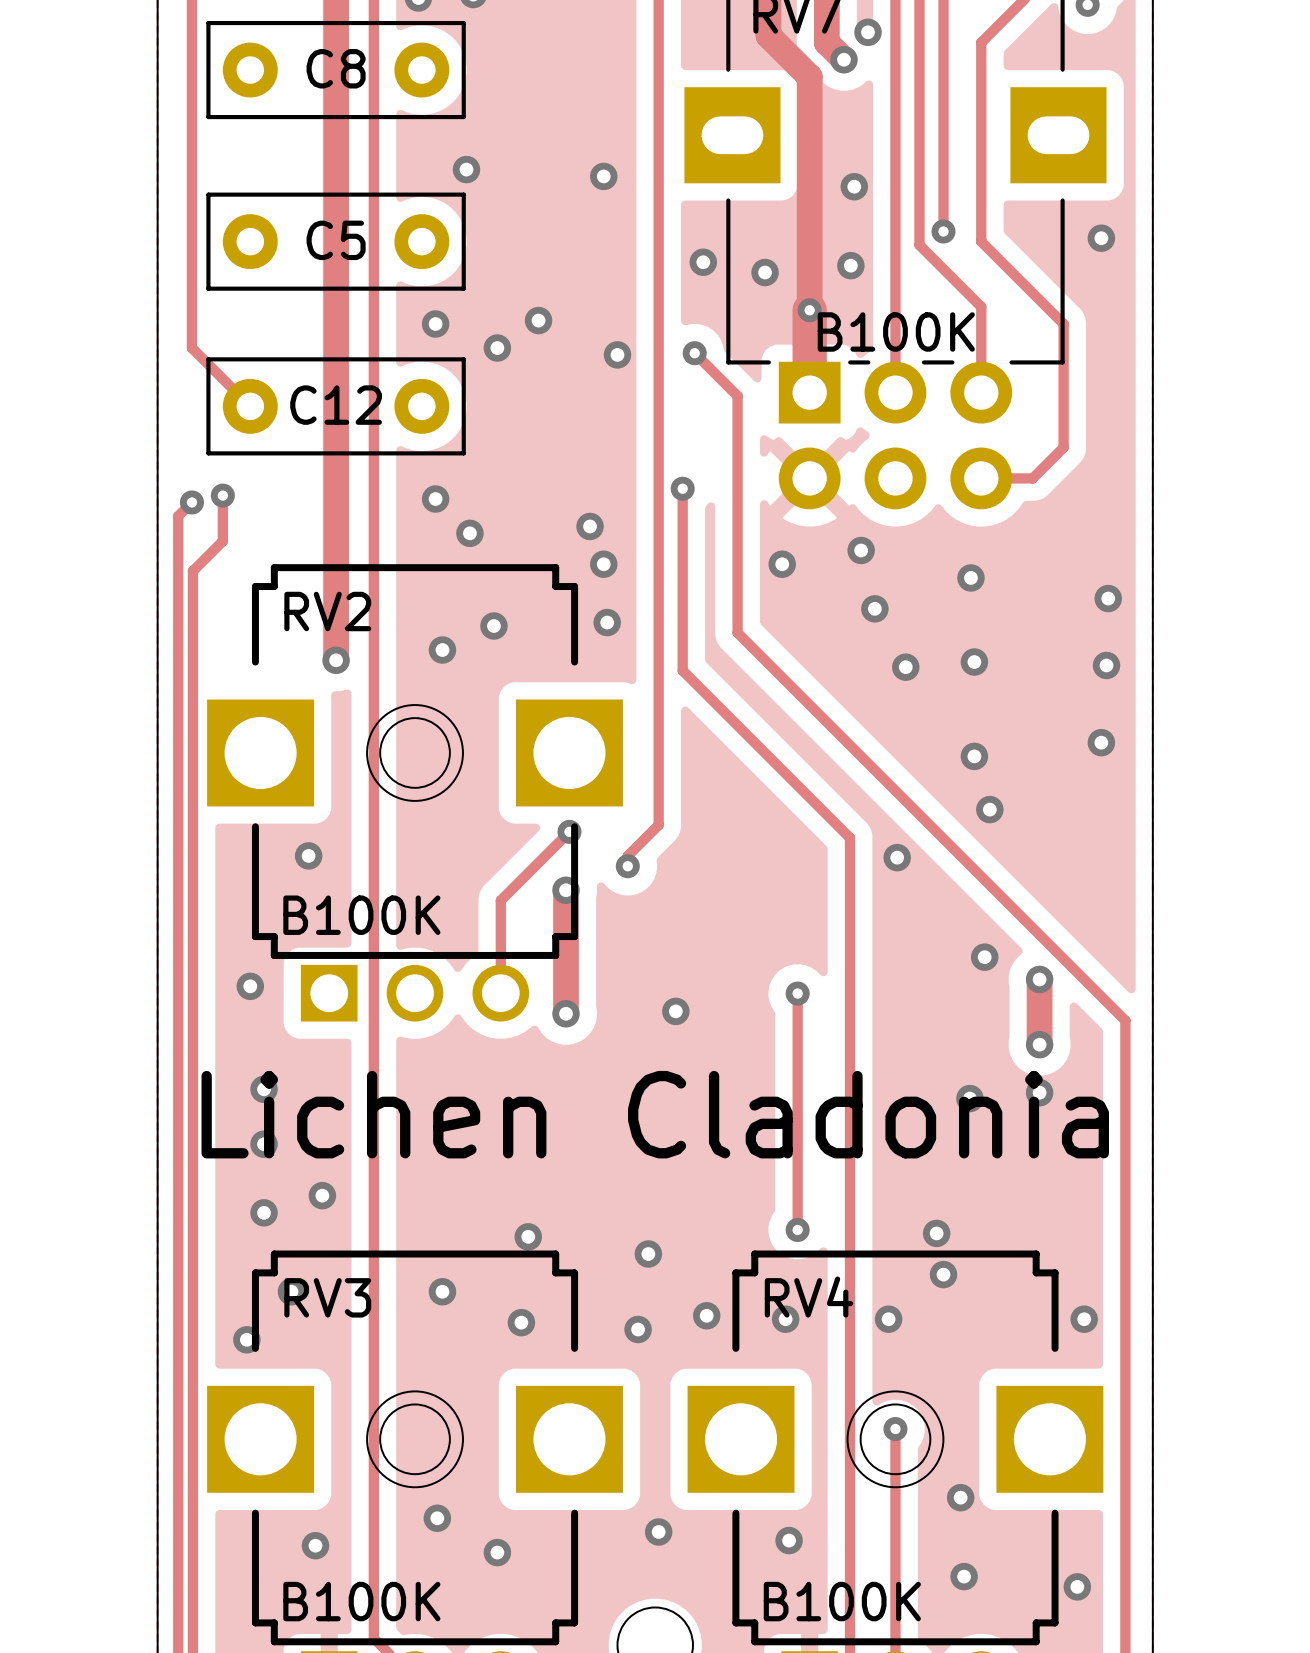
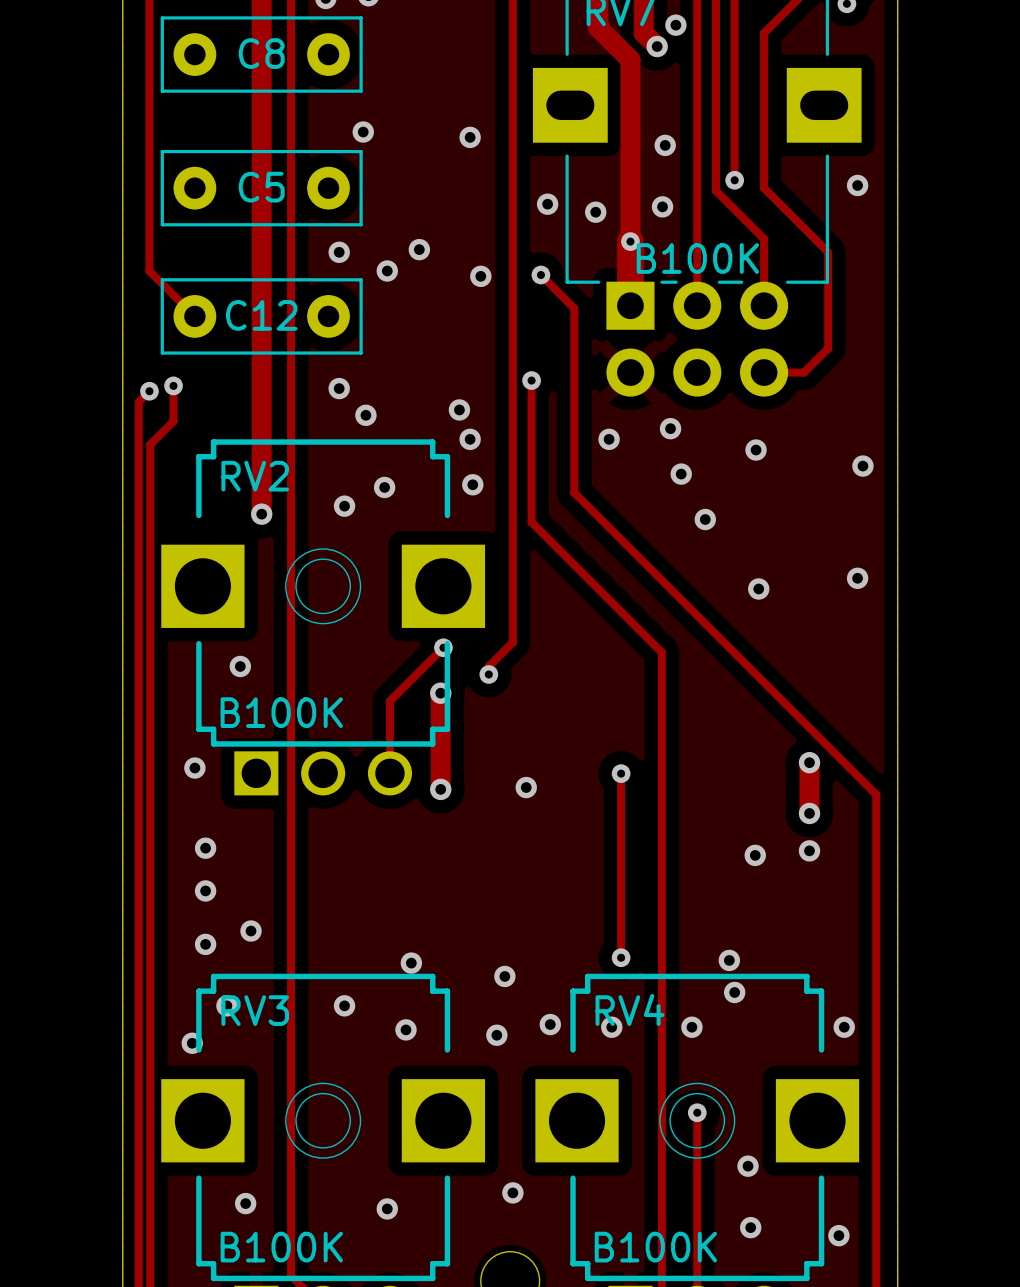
via: (974, 662) -> none
via: (1106, 665) -> none
via: (989, 809) -> none
via: (897, 857) -> none
via: (984, 957) -> none
text: Lichen Cladonia (655, 1114) -> none
via: (437, 1518) -> none
via: (789, 1540) -> none

